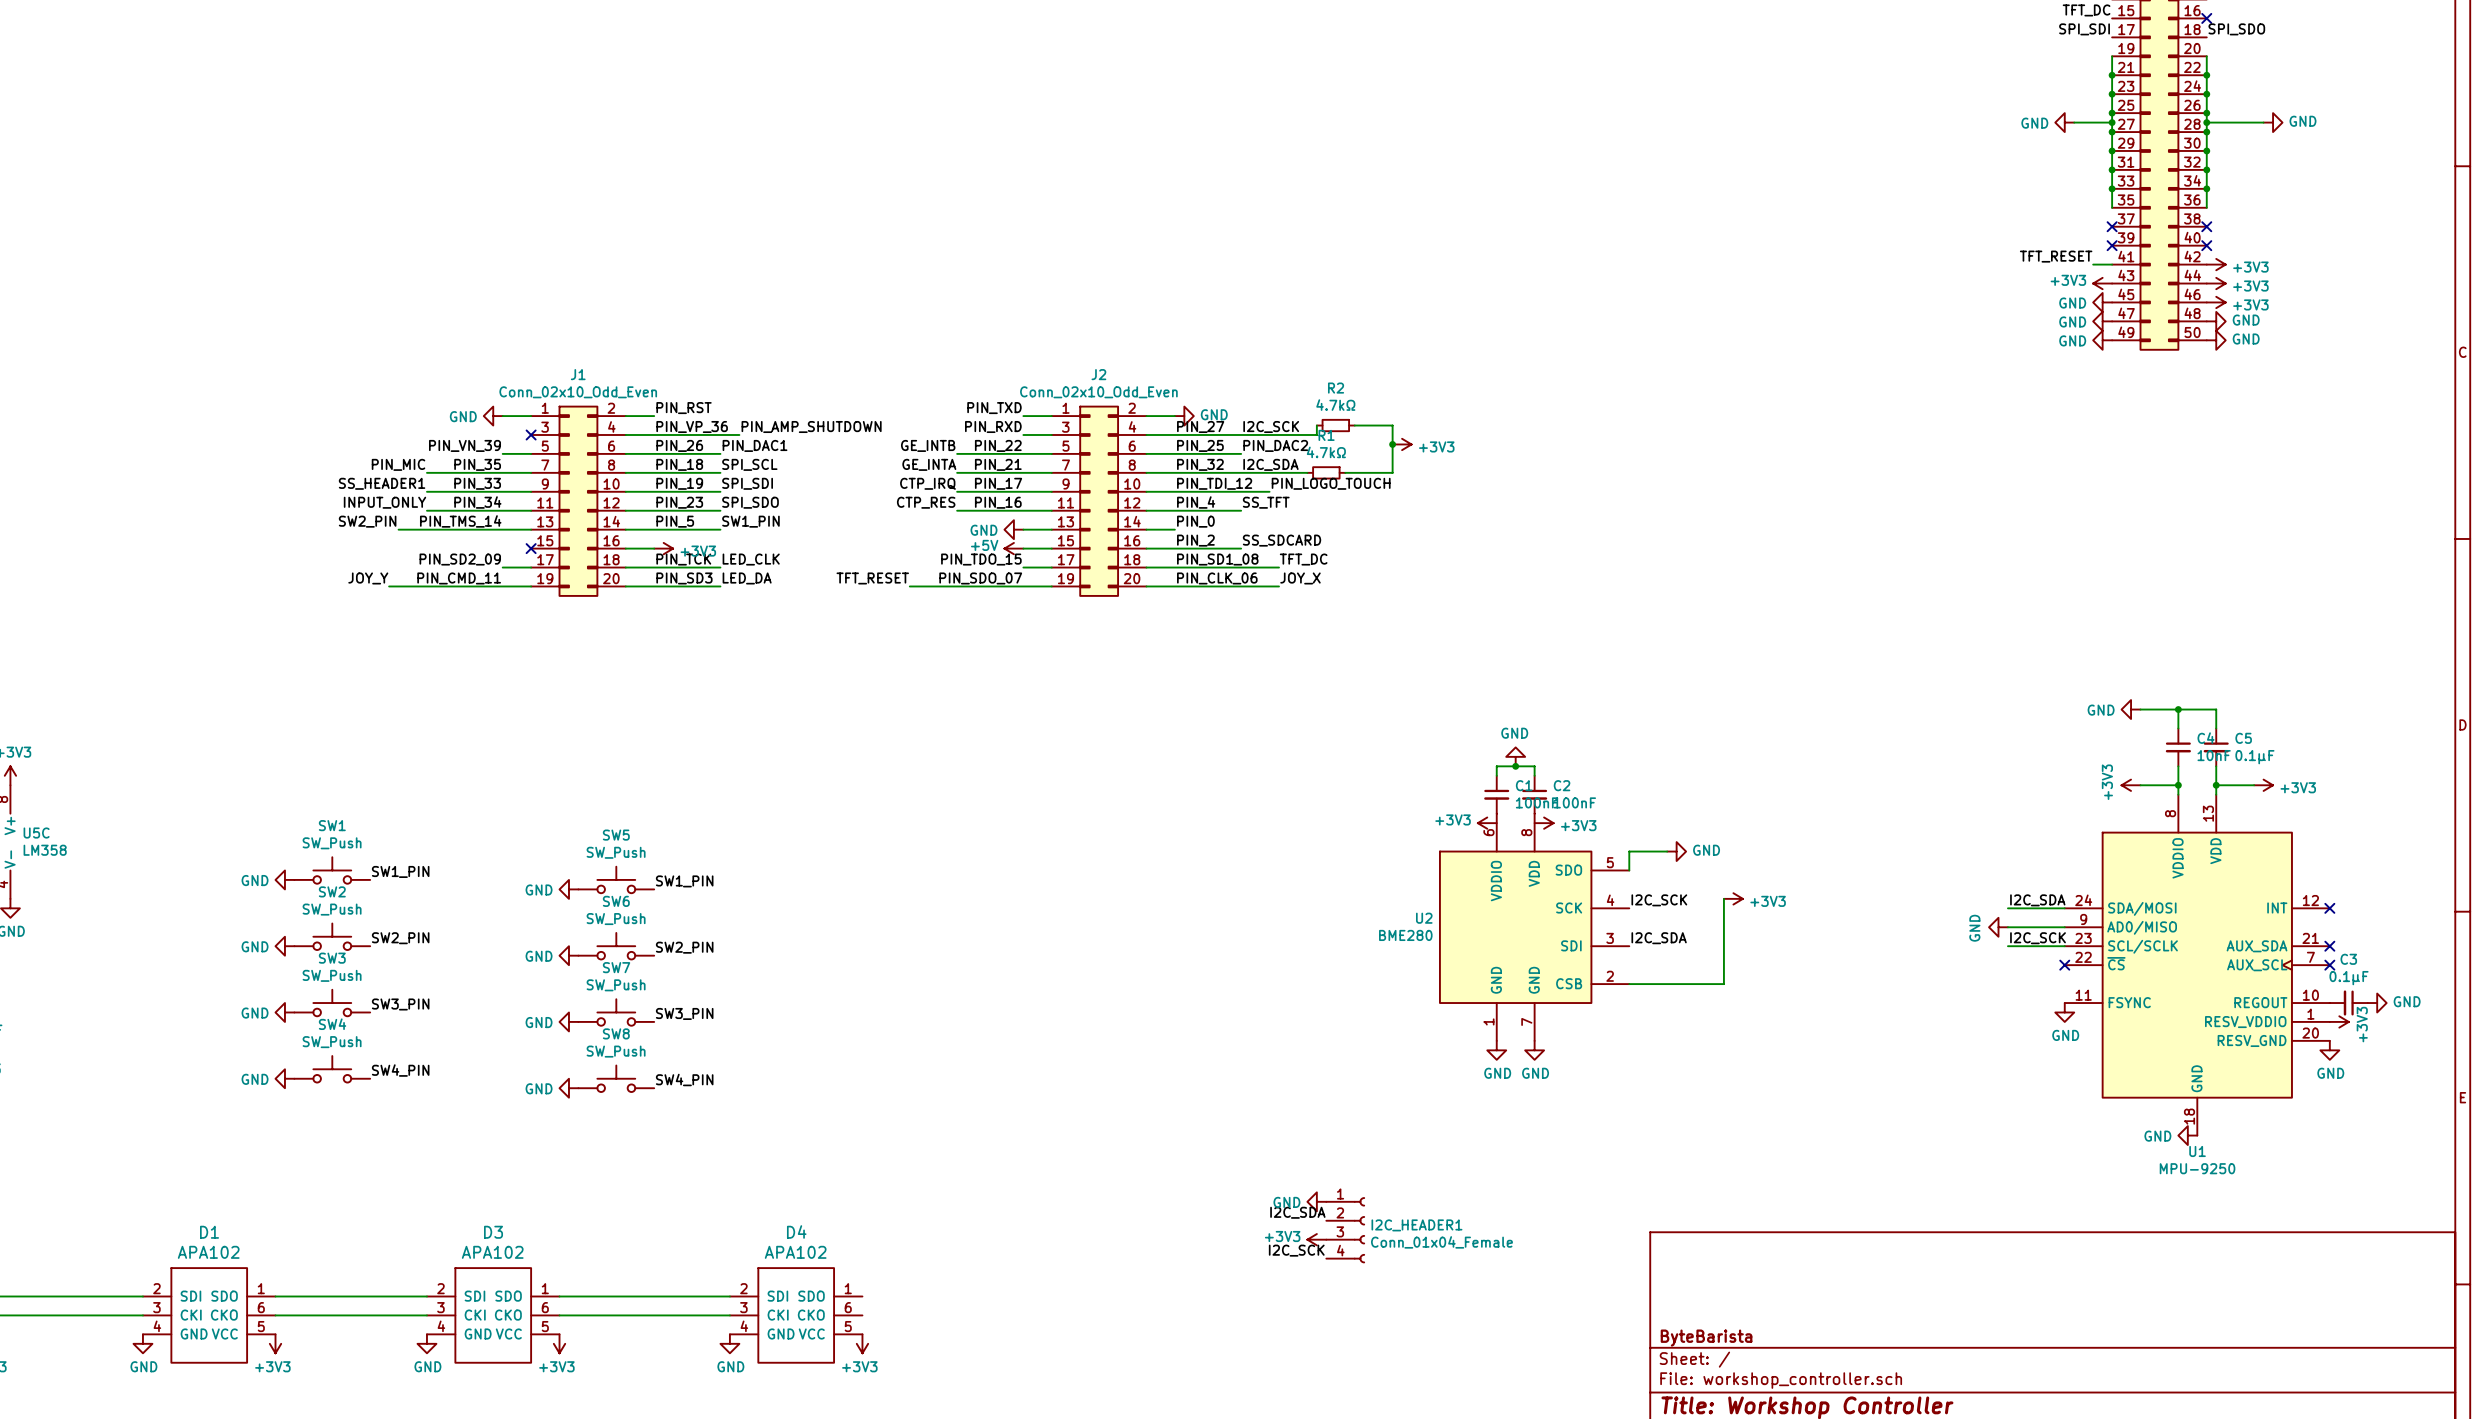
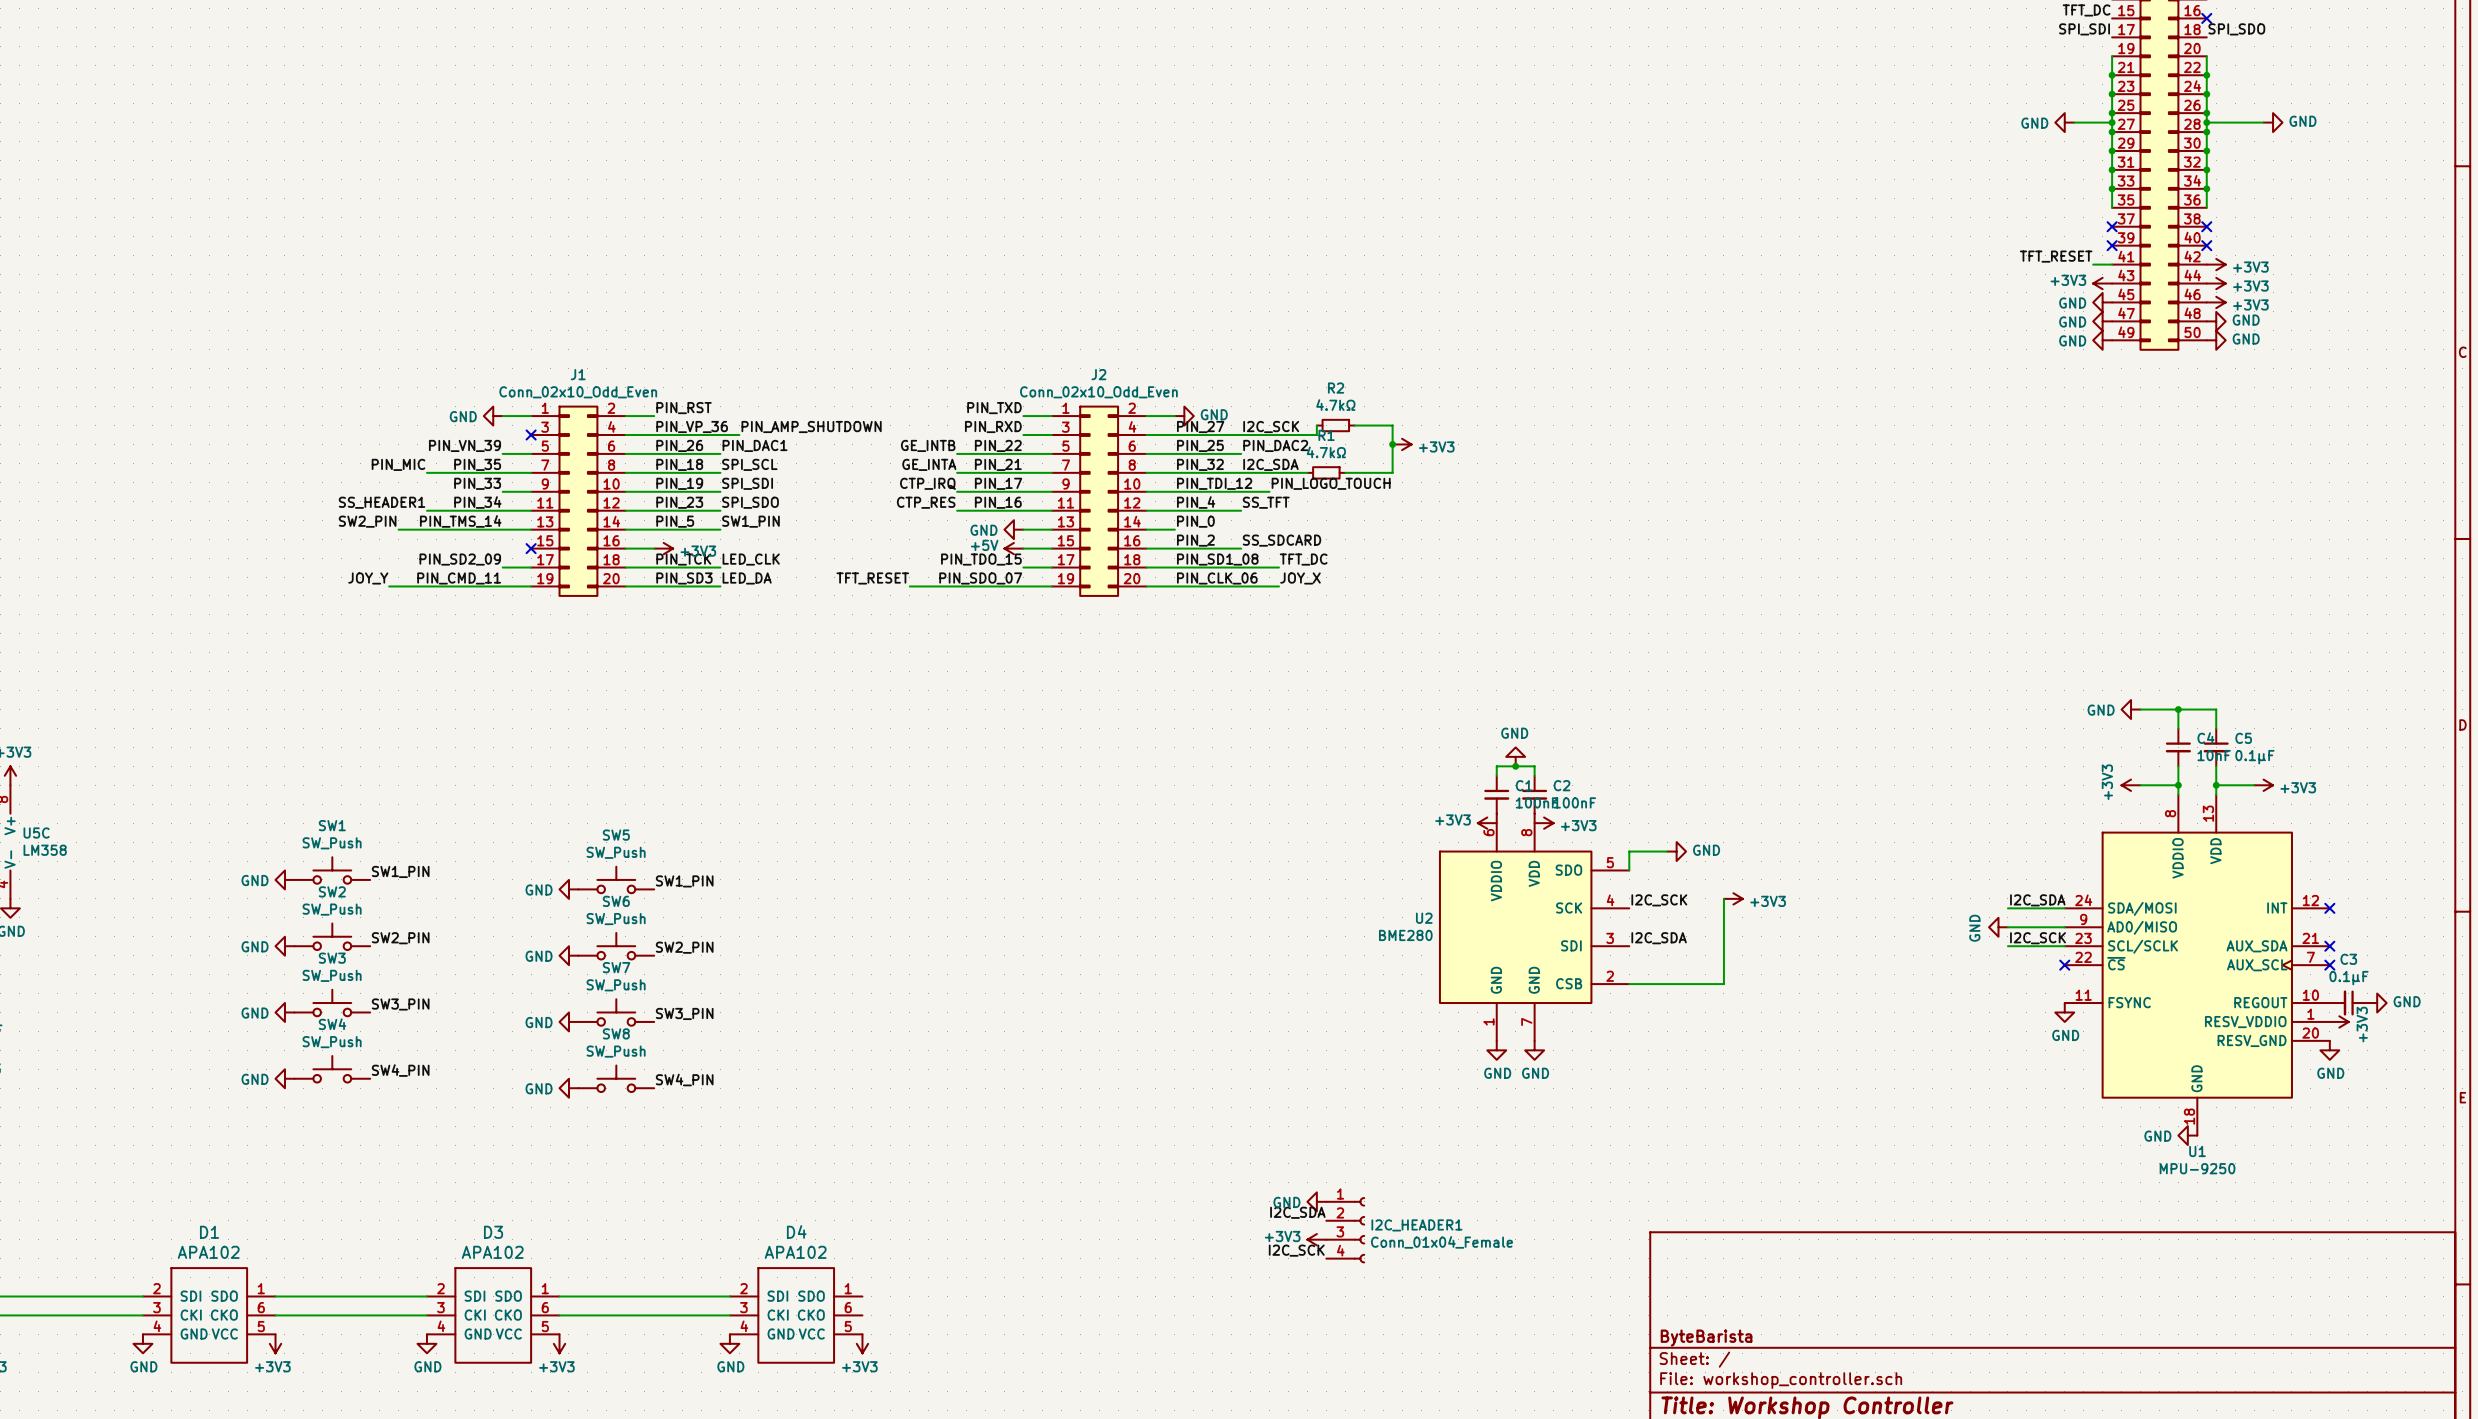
label: SS_HEADER1 (382, 483) -> none
wire: (426, 491) (502, 491) -> none
label: INPUT_ONLY (384, 502) -> SS_HEADER1 (382, 502)

